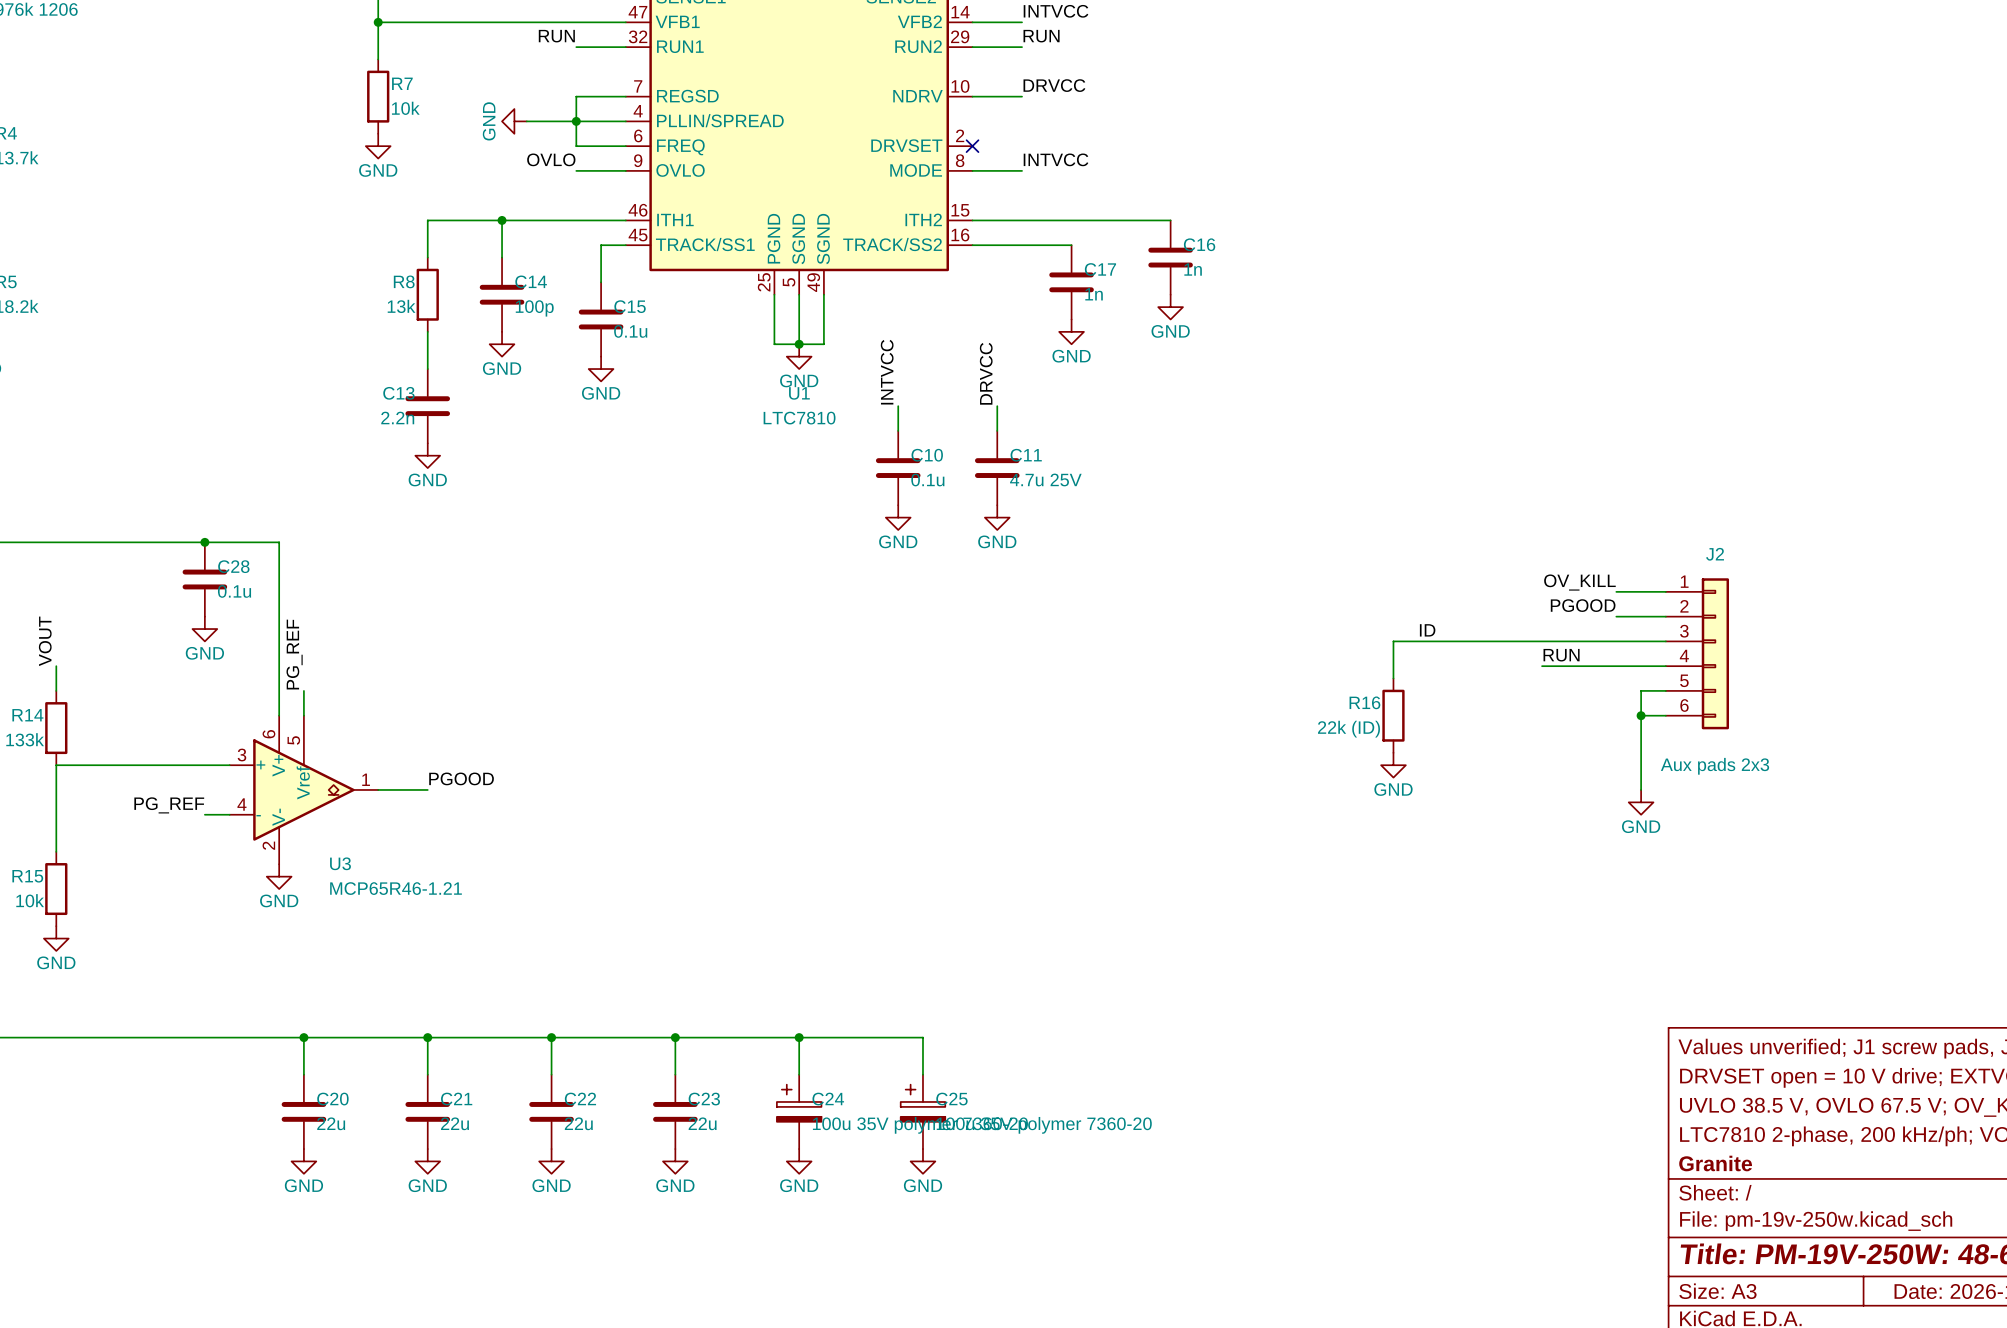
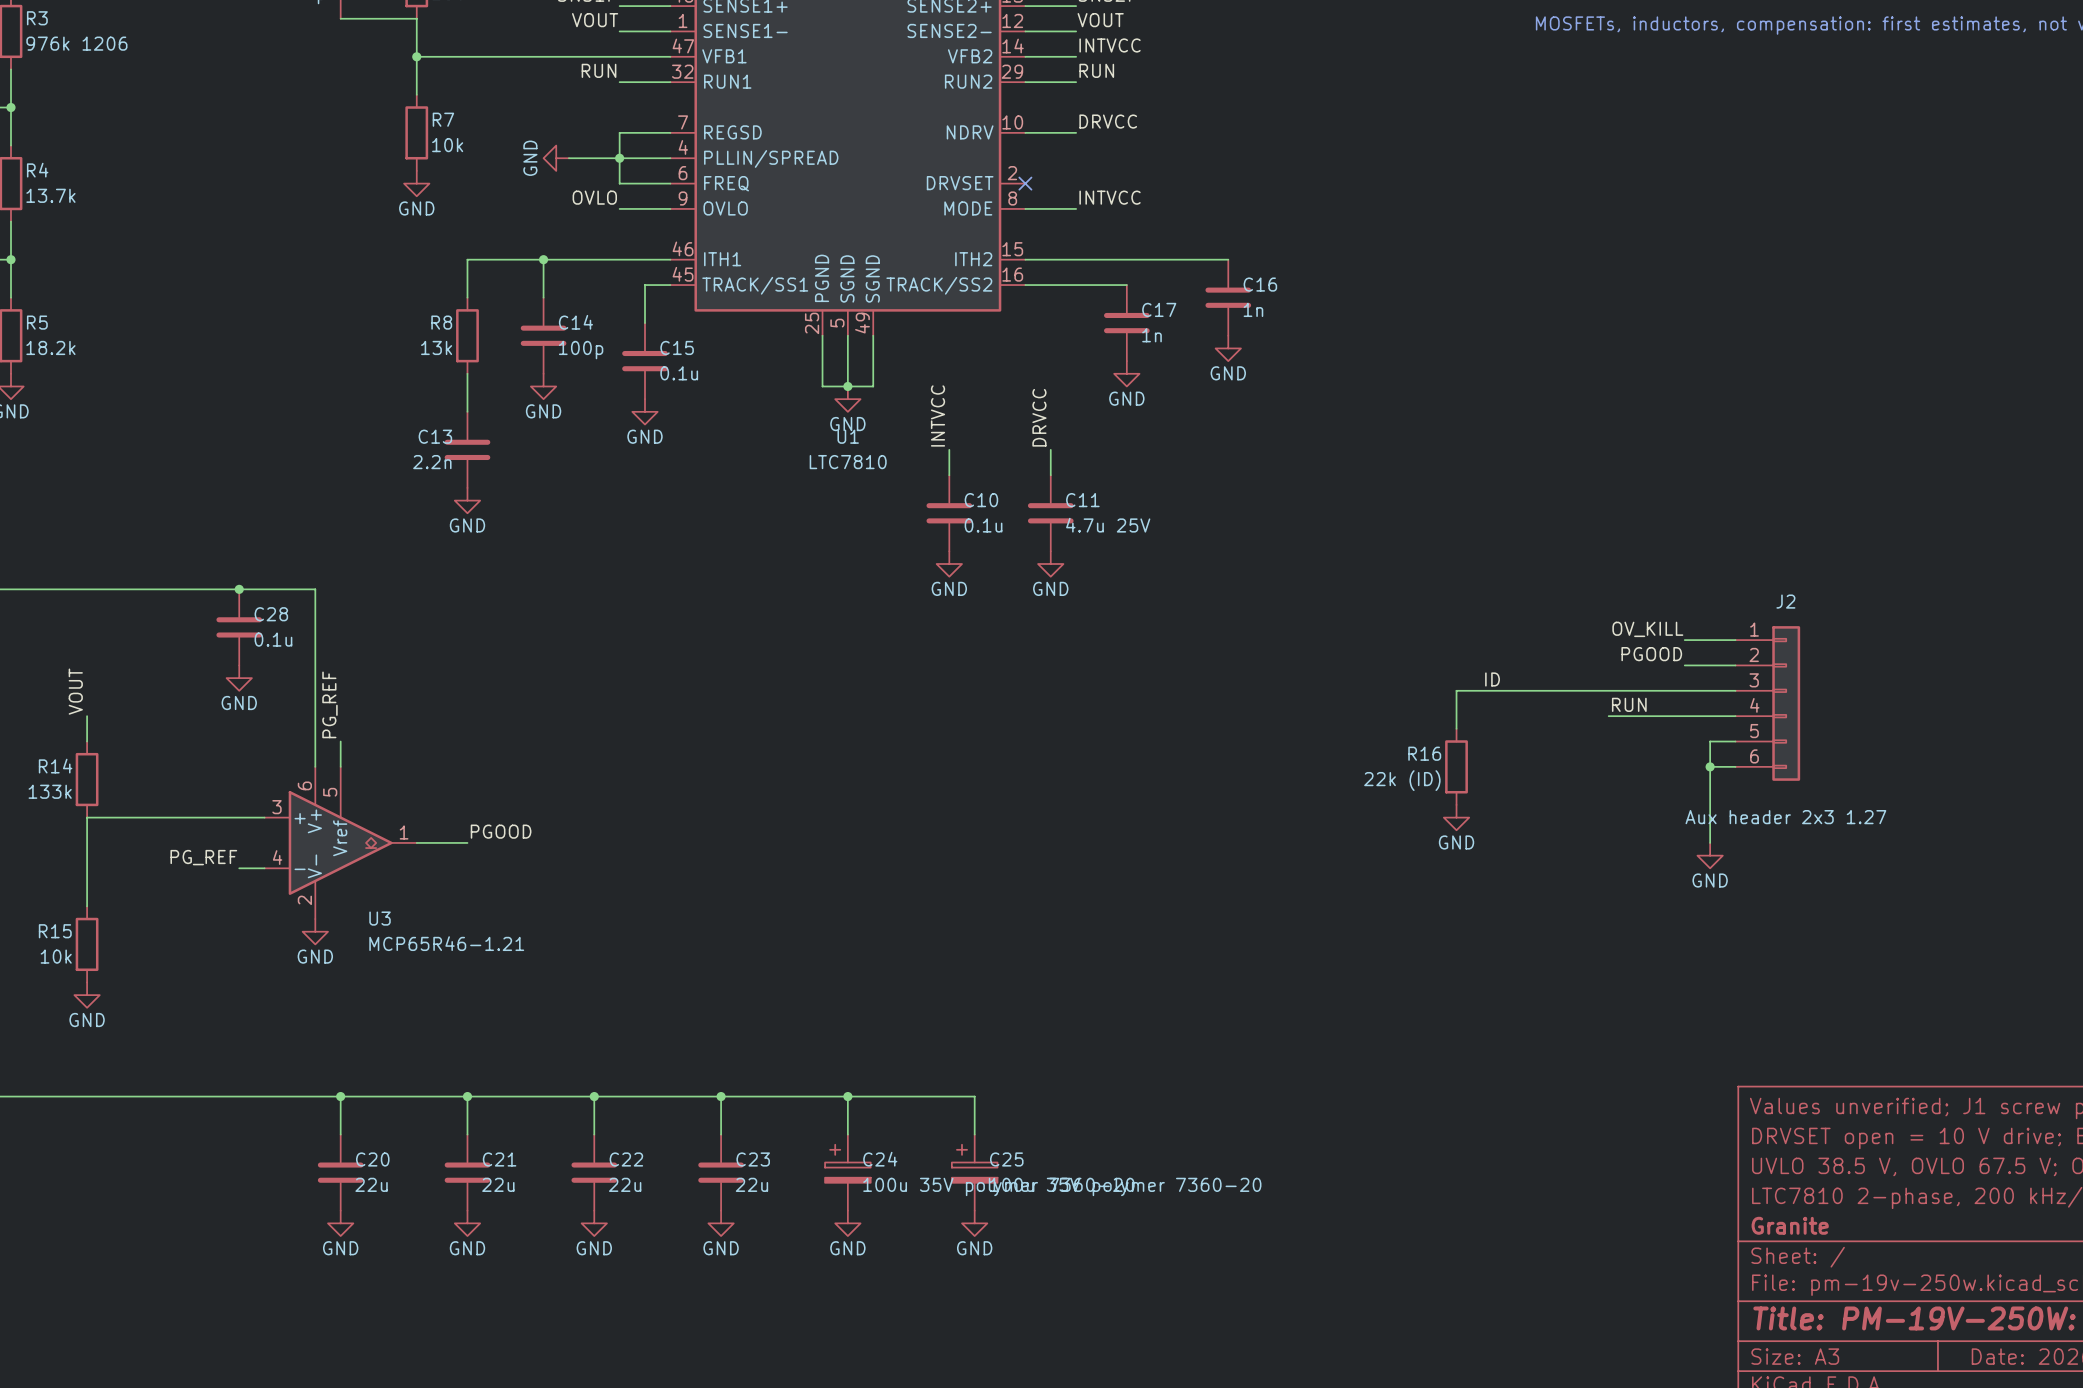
J2 value: Aux pads 2x3 (1715, 766) -> Aux header 2x3 1.27 (1785, 817)

